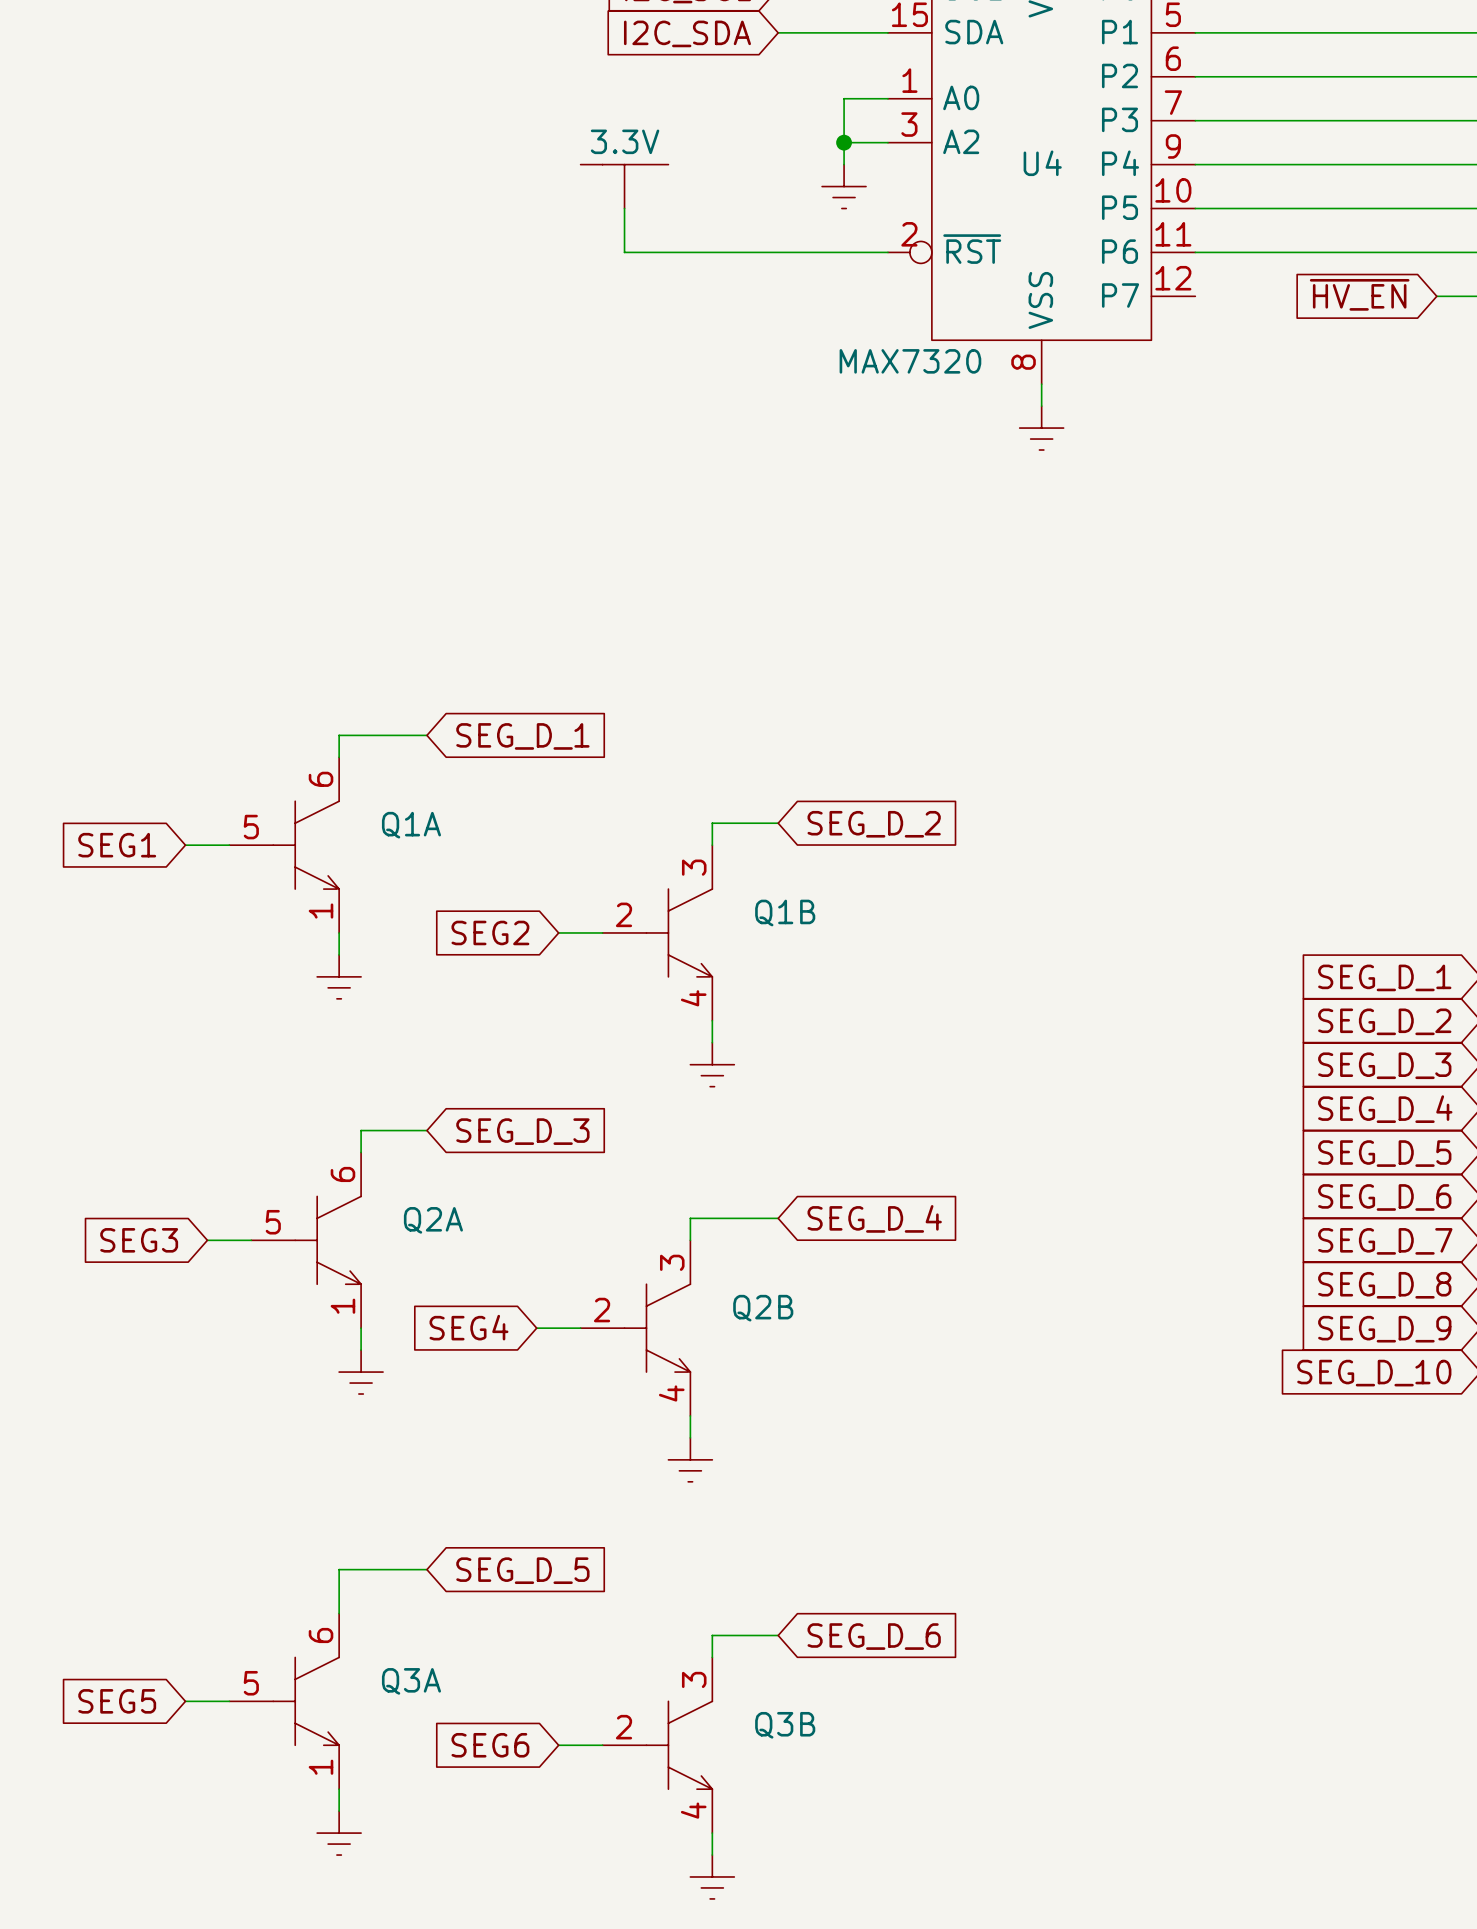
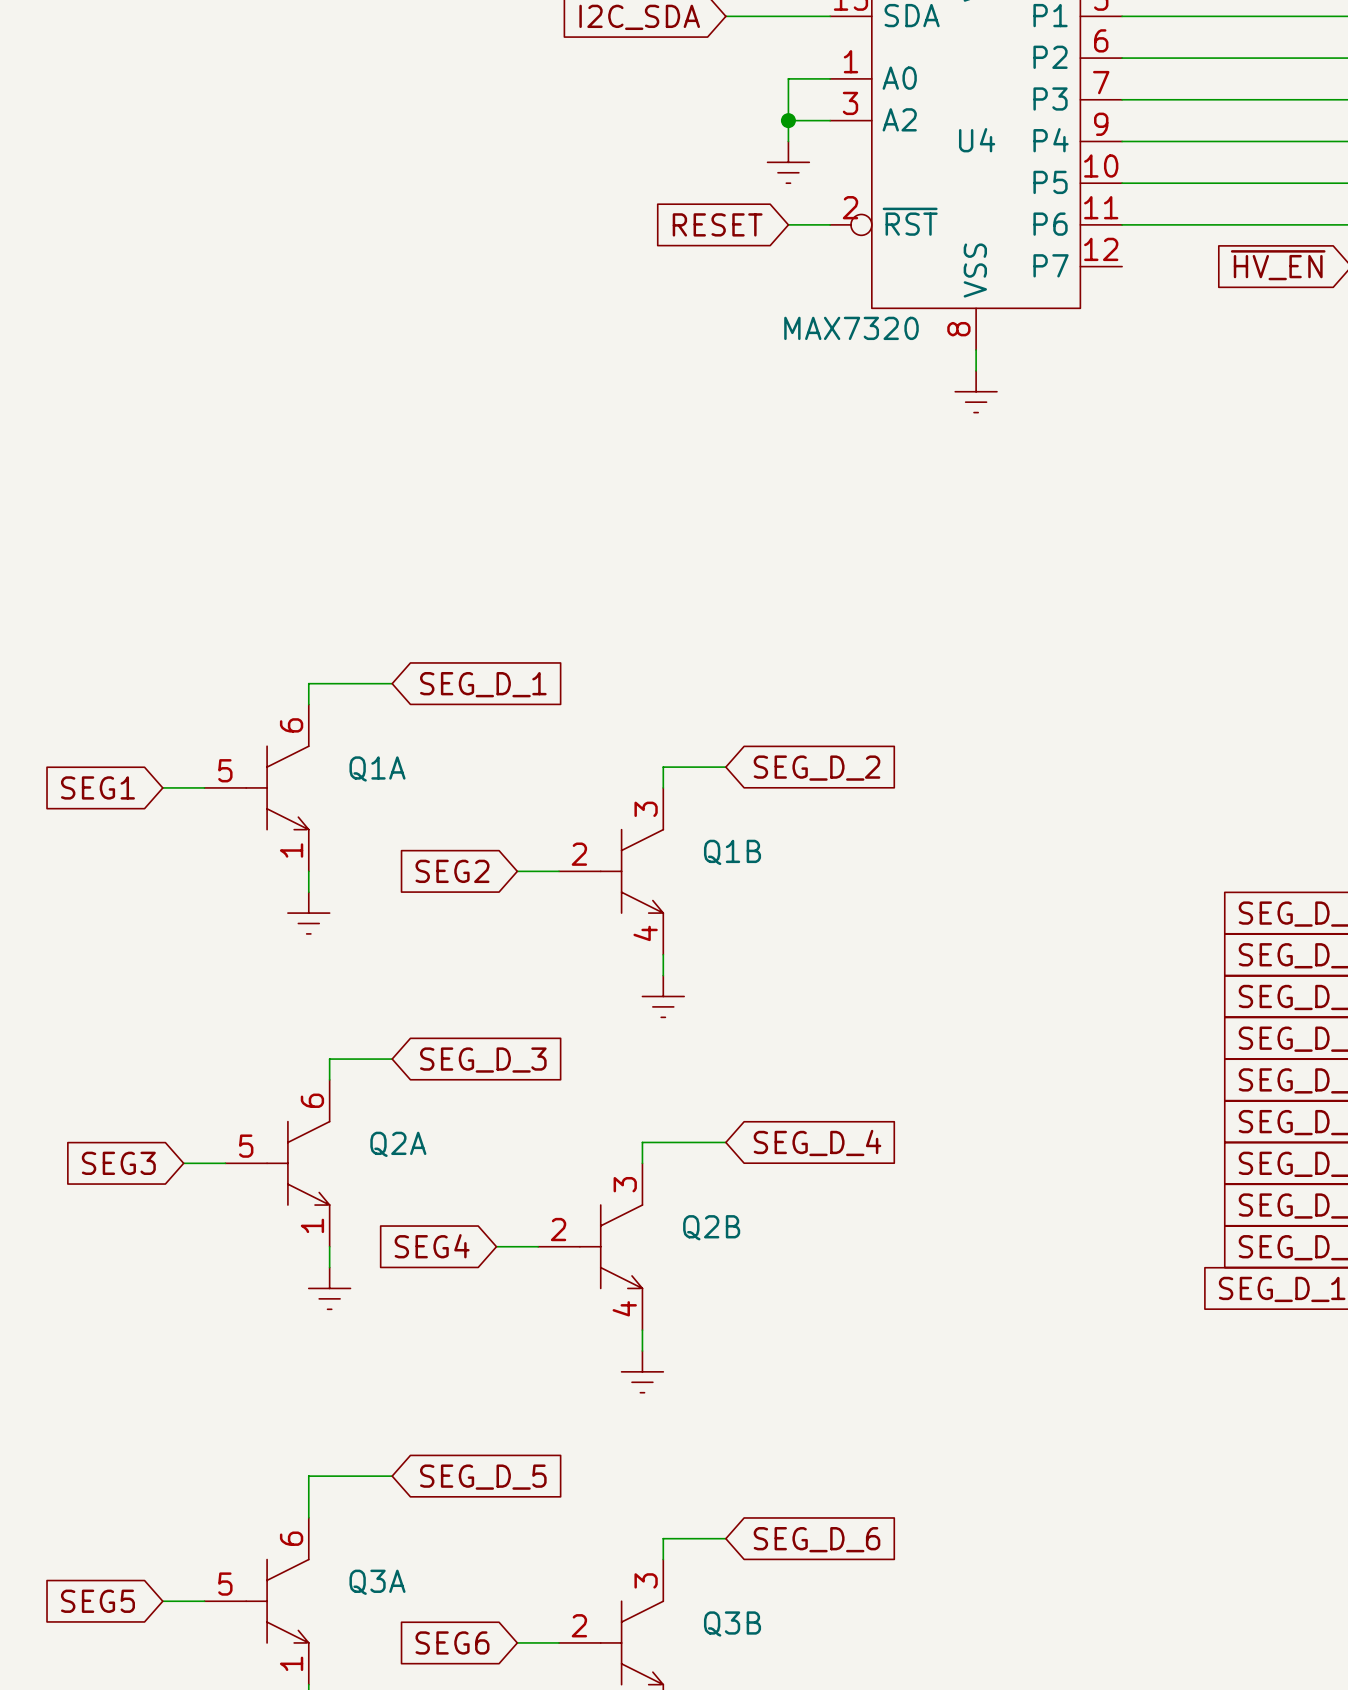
part: 3.3V (624, 186) -> none
wire: (624, 208) (624, 252) (844, 252) -> none
global label: none -> RESET (717, 224)

